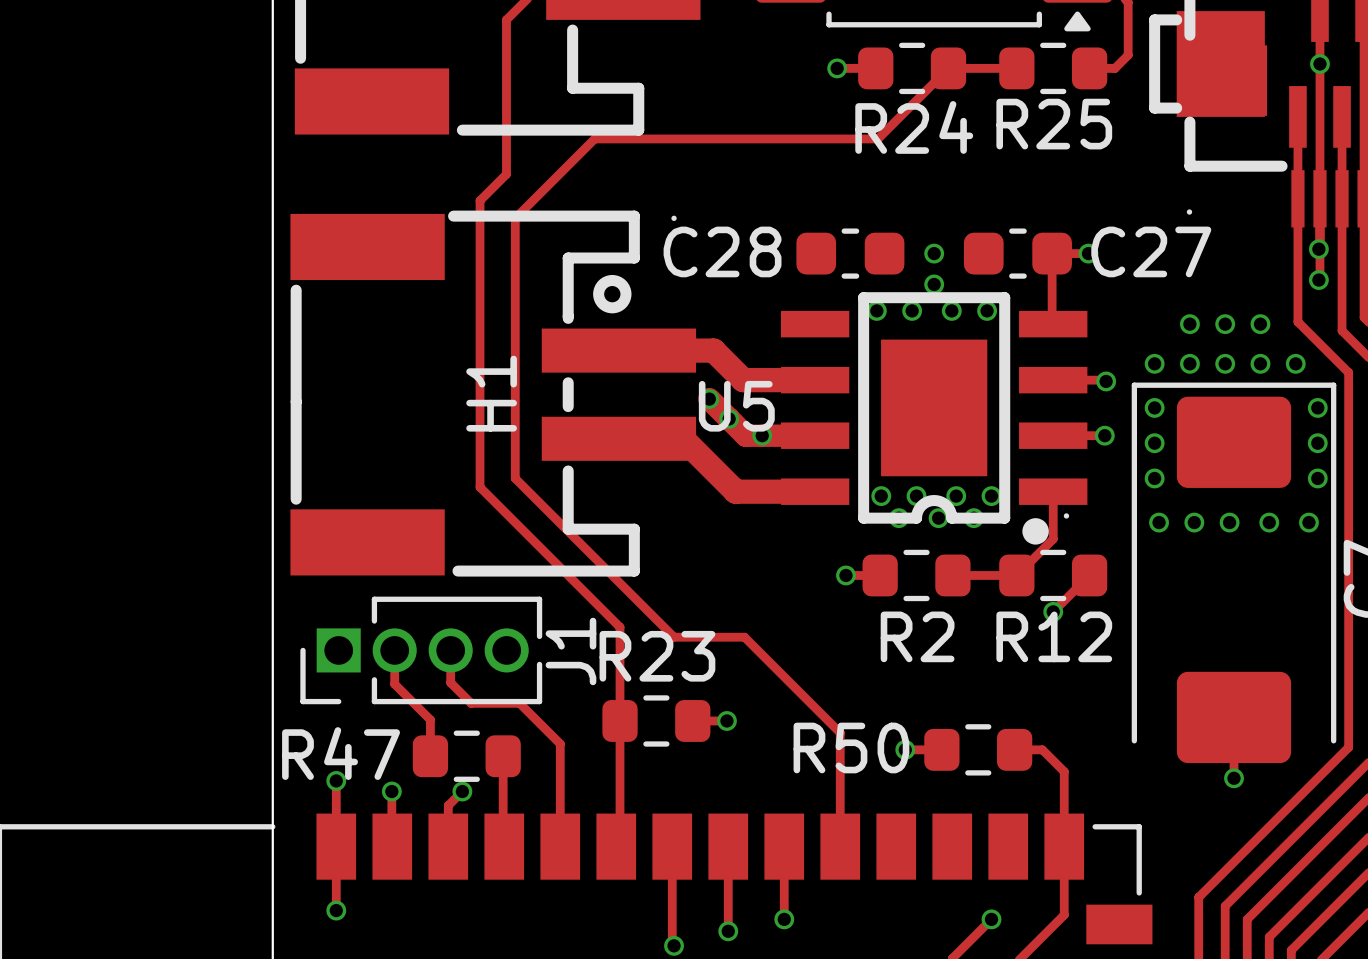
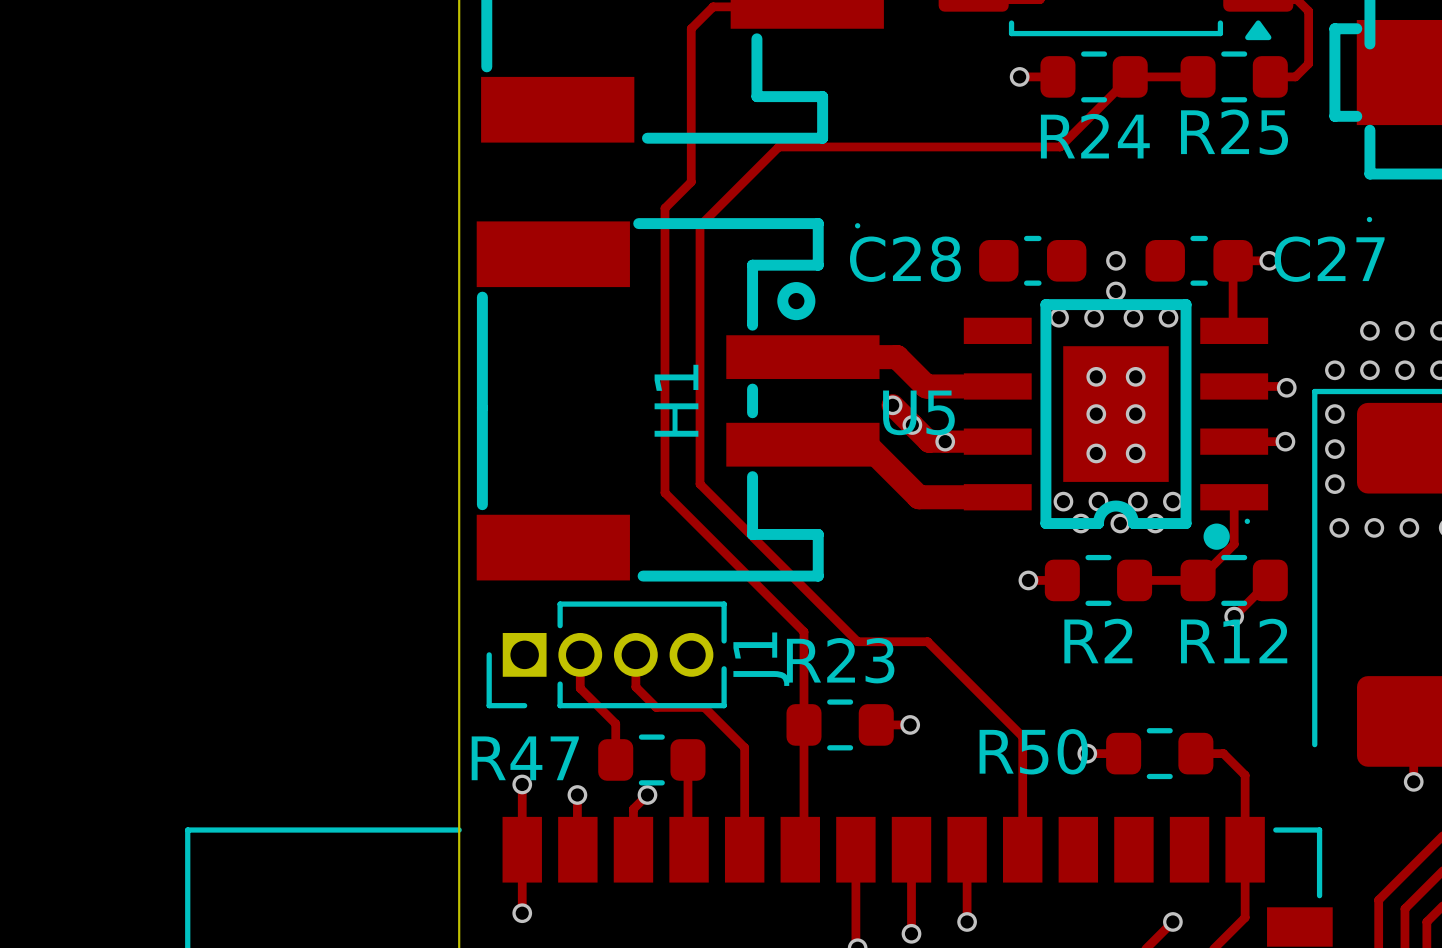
via: none -> (1096, 376)
via: none -> (1135, 376)
via: none -> (1096, 414)
via: none -> (1135, 414)
via: none -> (1096, 453)
via: none -> (1135, 453)

